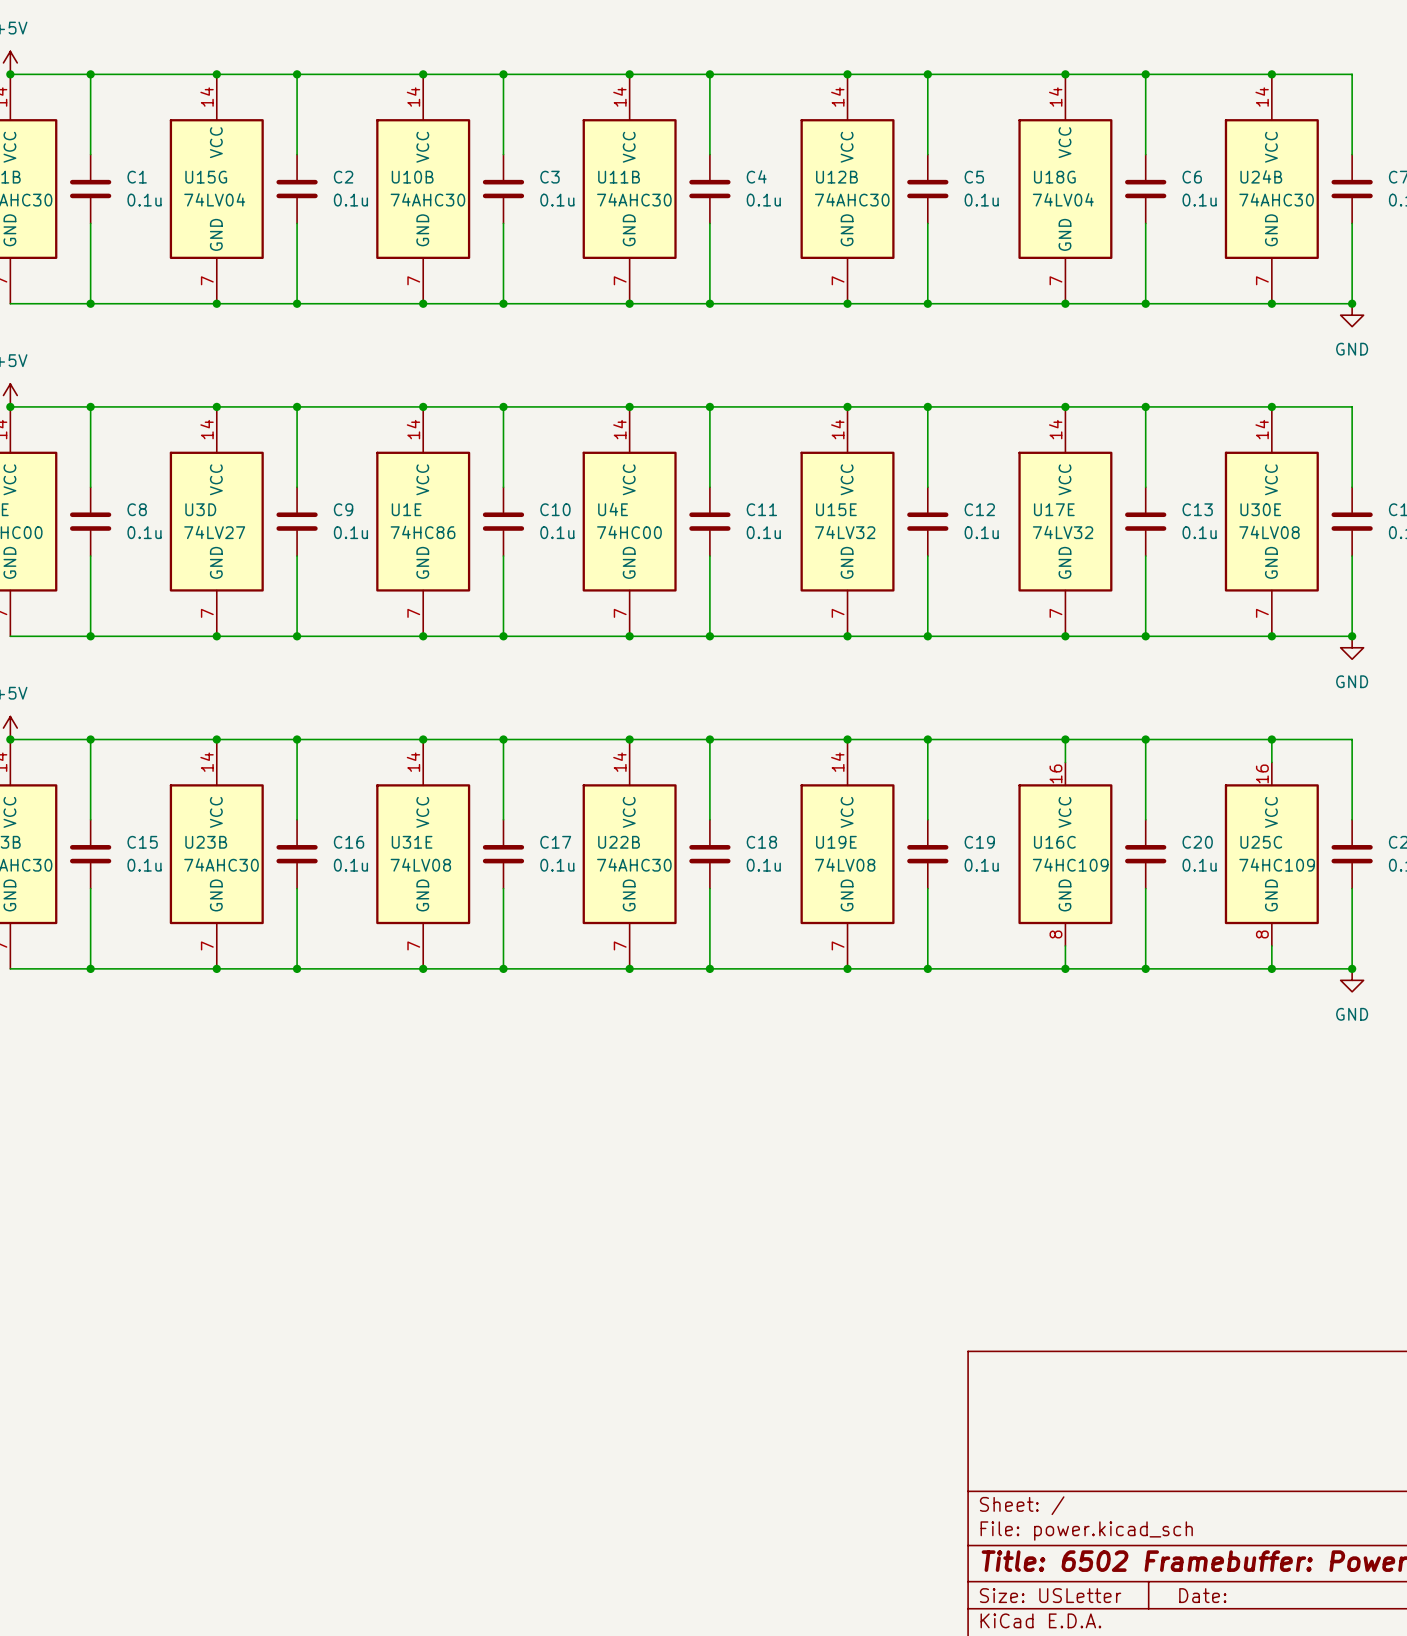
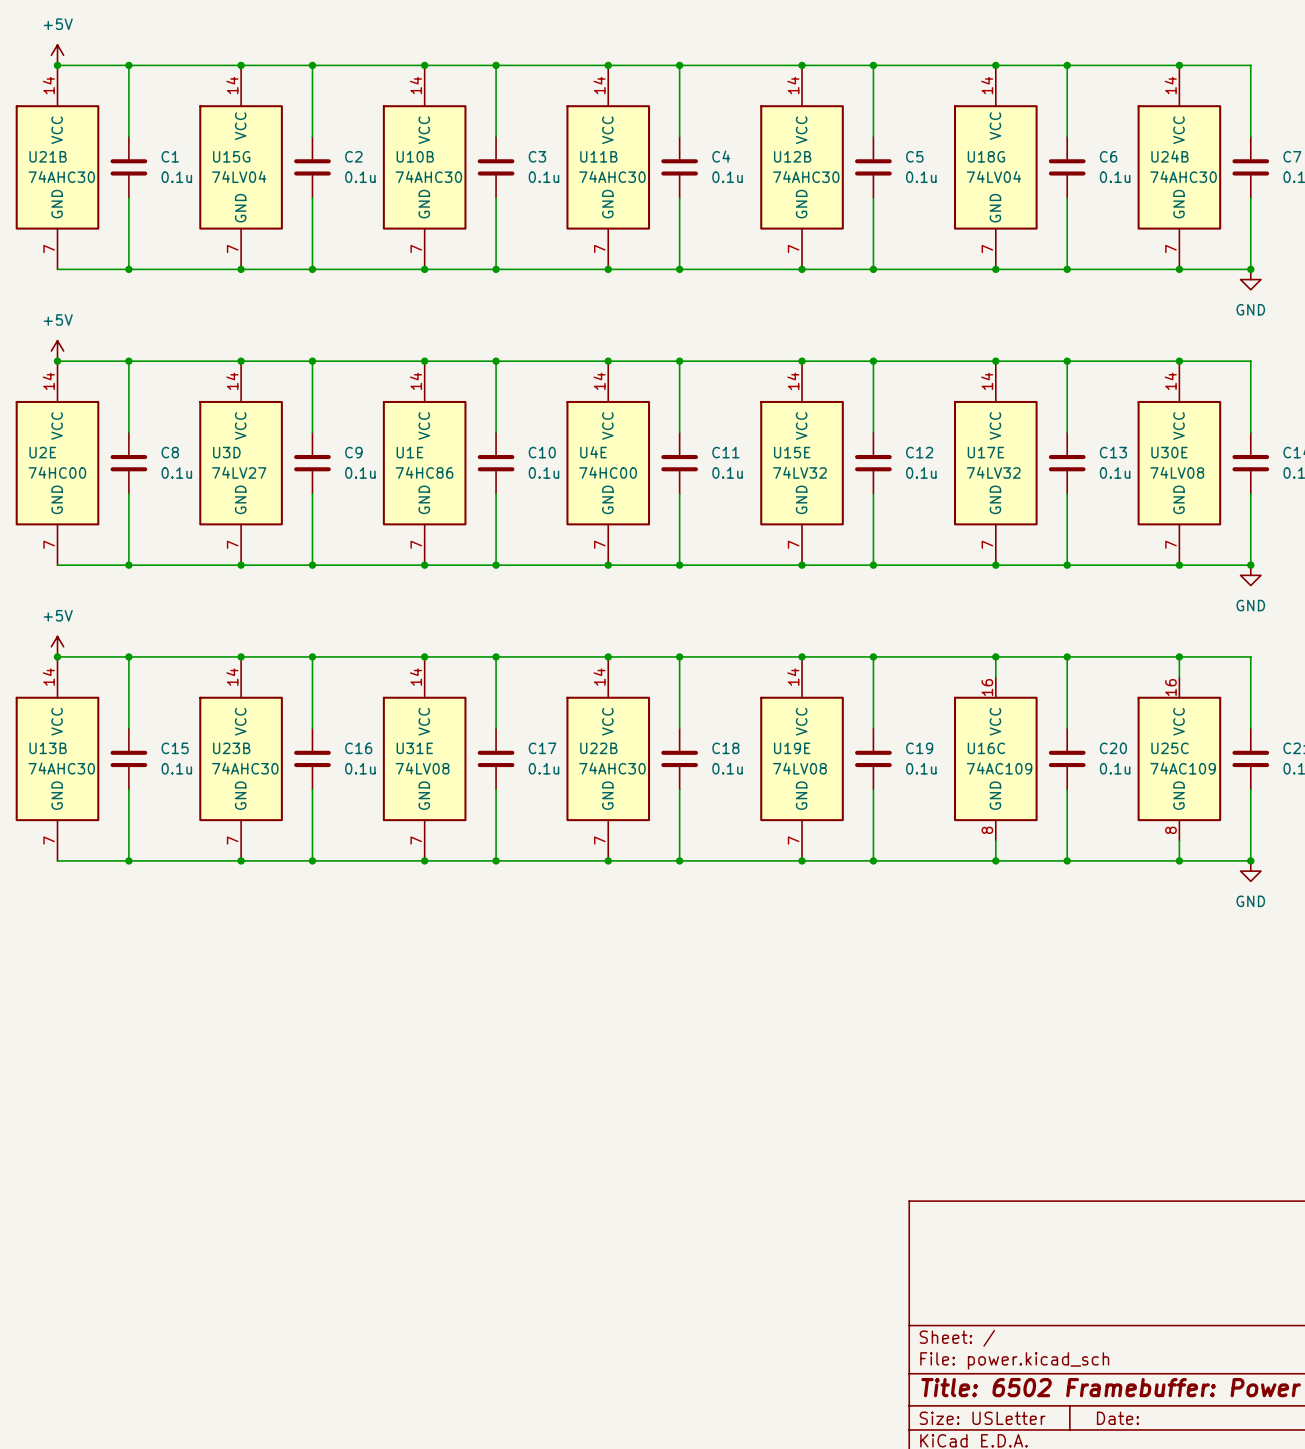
U16C value: 74HC109 (1070, 864) -> 74AC109 (999, 768)
U25C value: 74HC109 (1277, 864) -> 74AC109 (1183, 768)

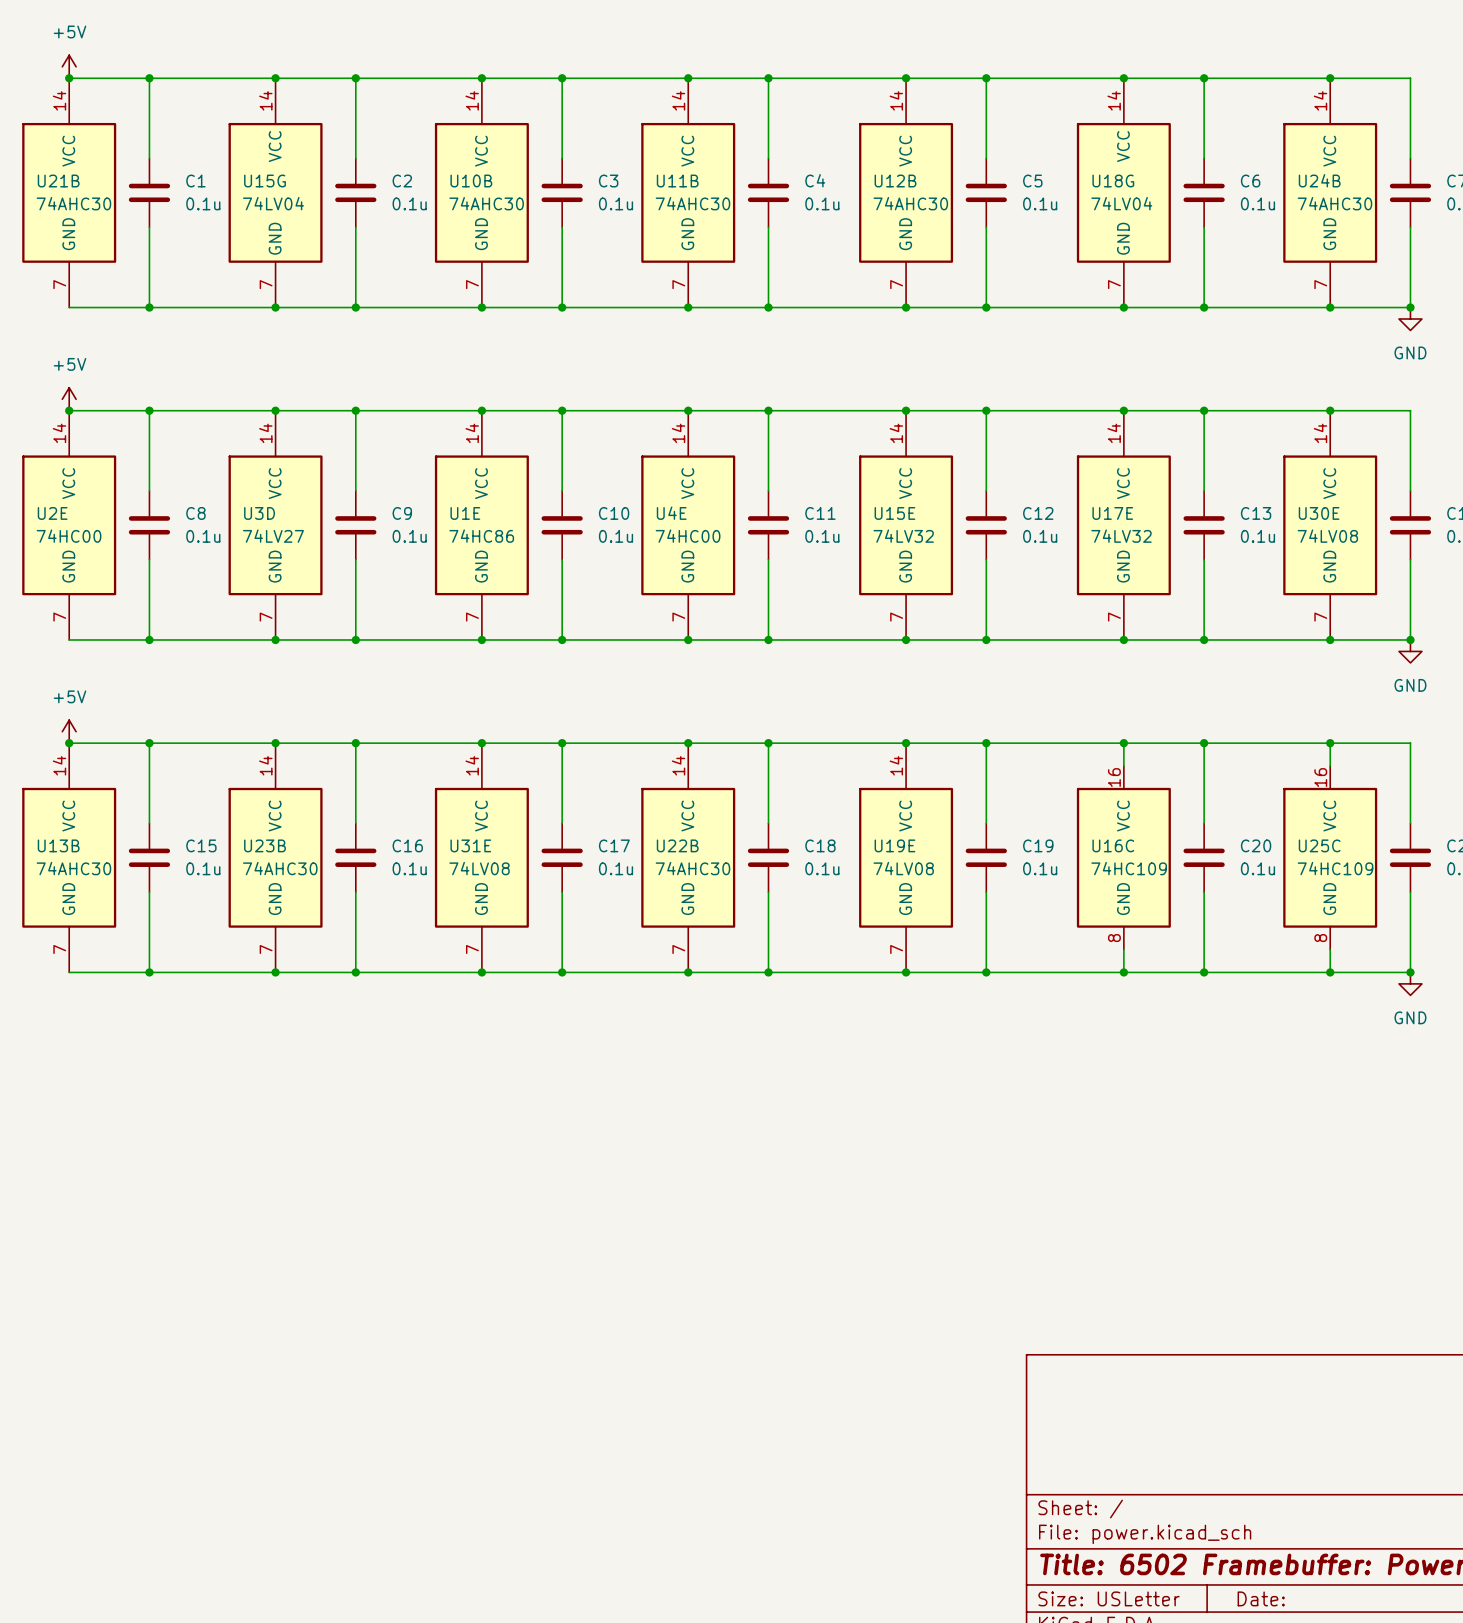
U16C value: 74AC109 (999, 768) -> 74HC109 (1129, 868)
U25C value: 74AC109 (1183, 768) -> 74HC109 (1335, 868)

